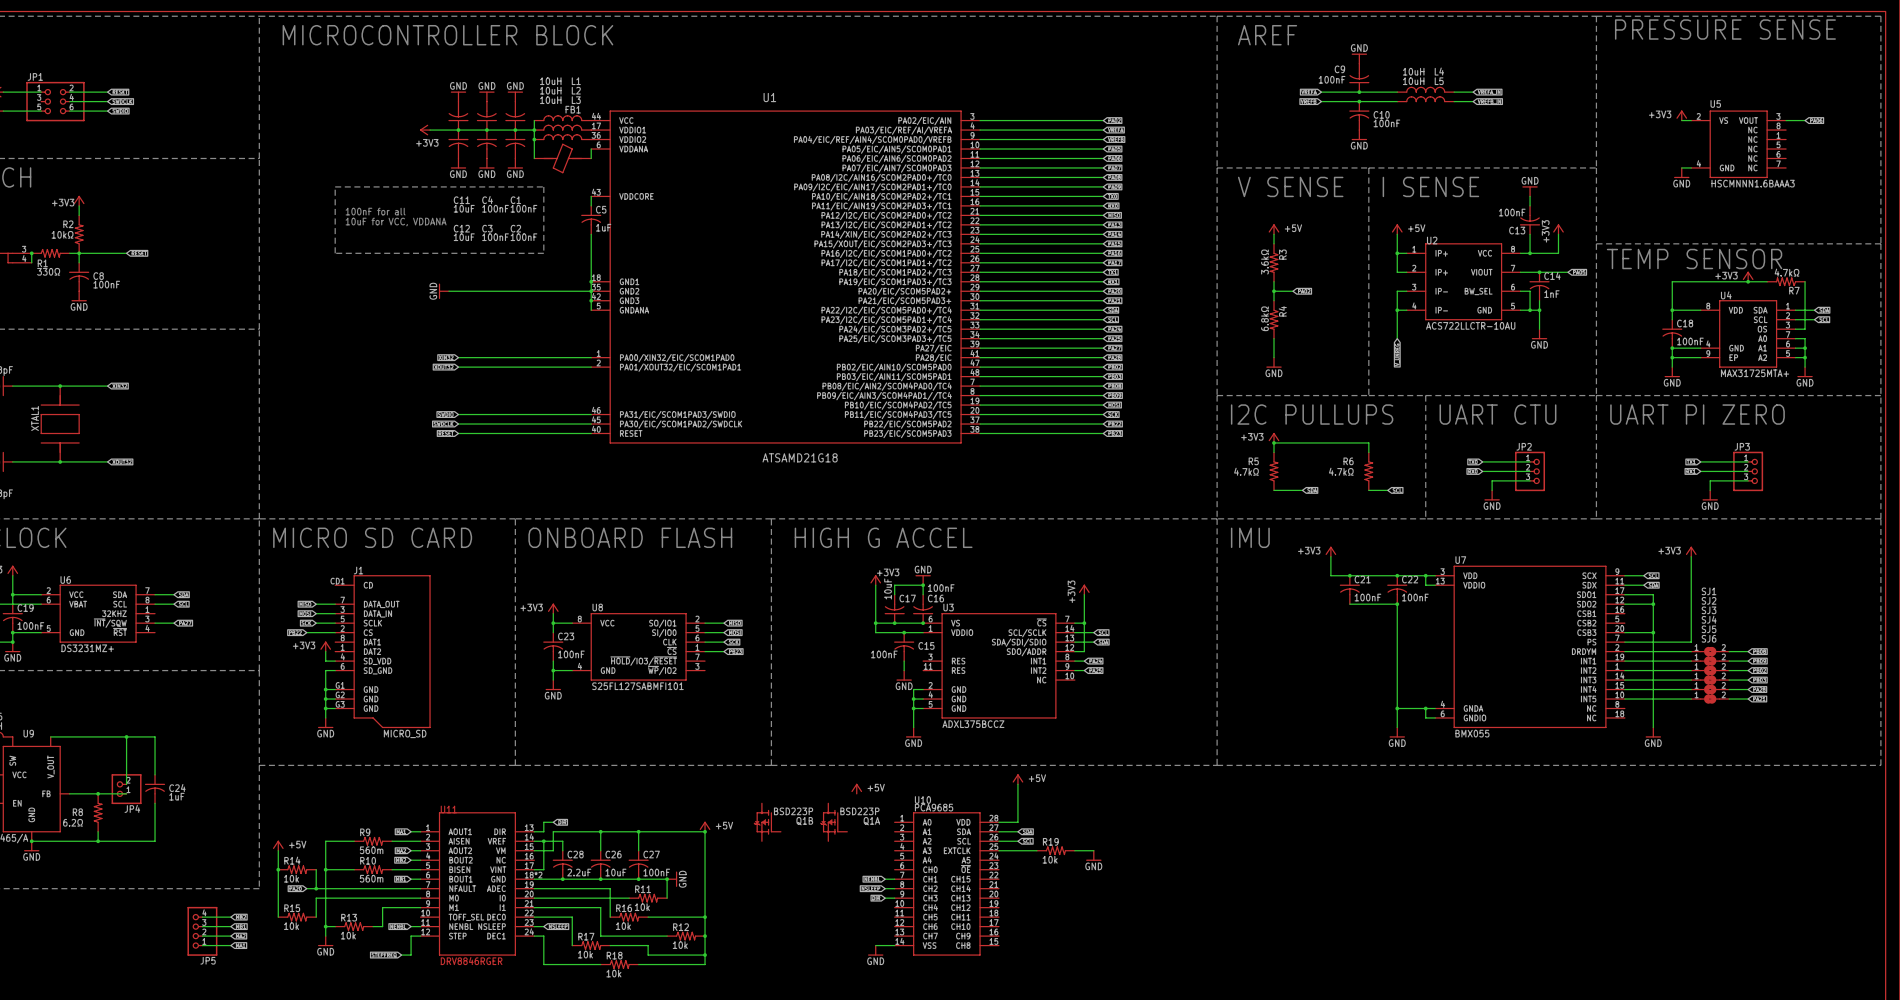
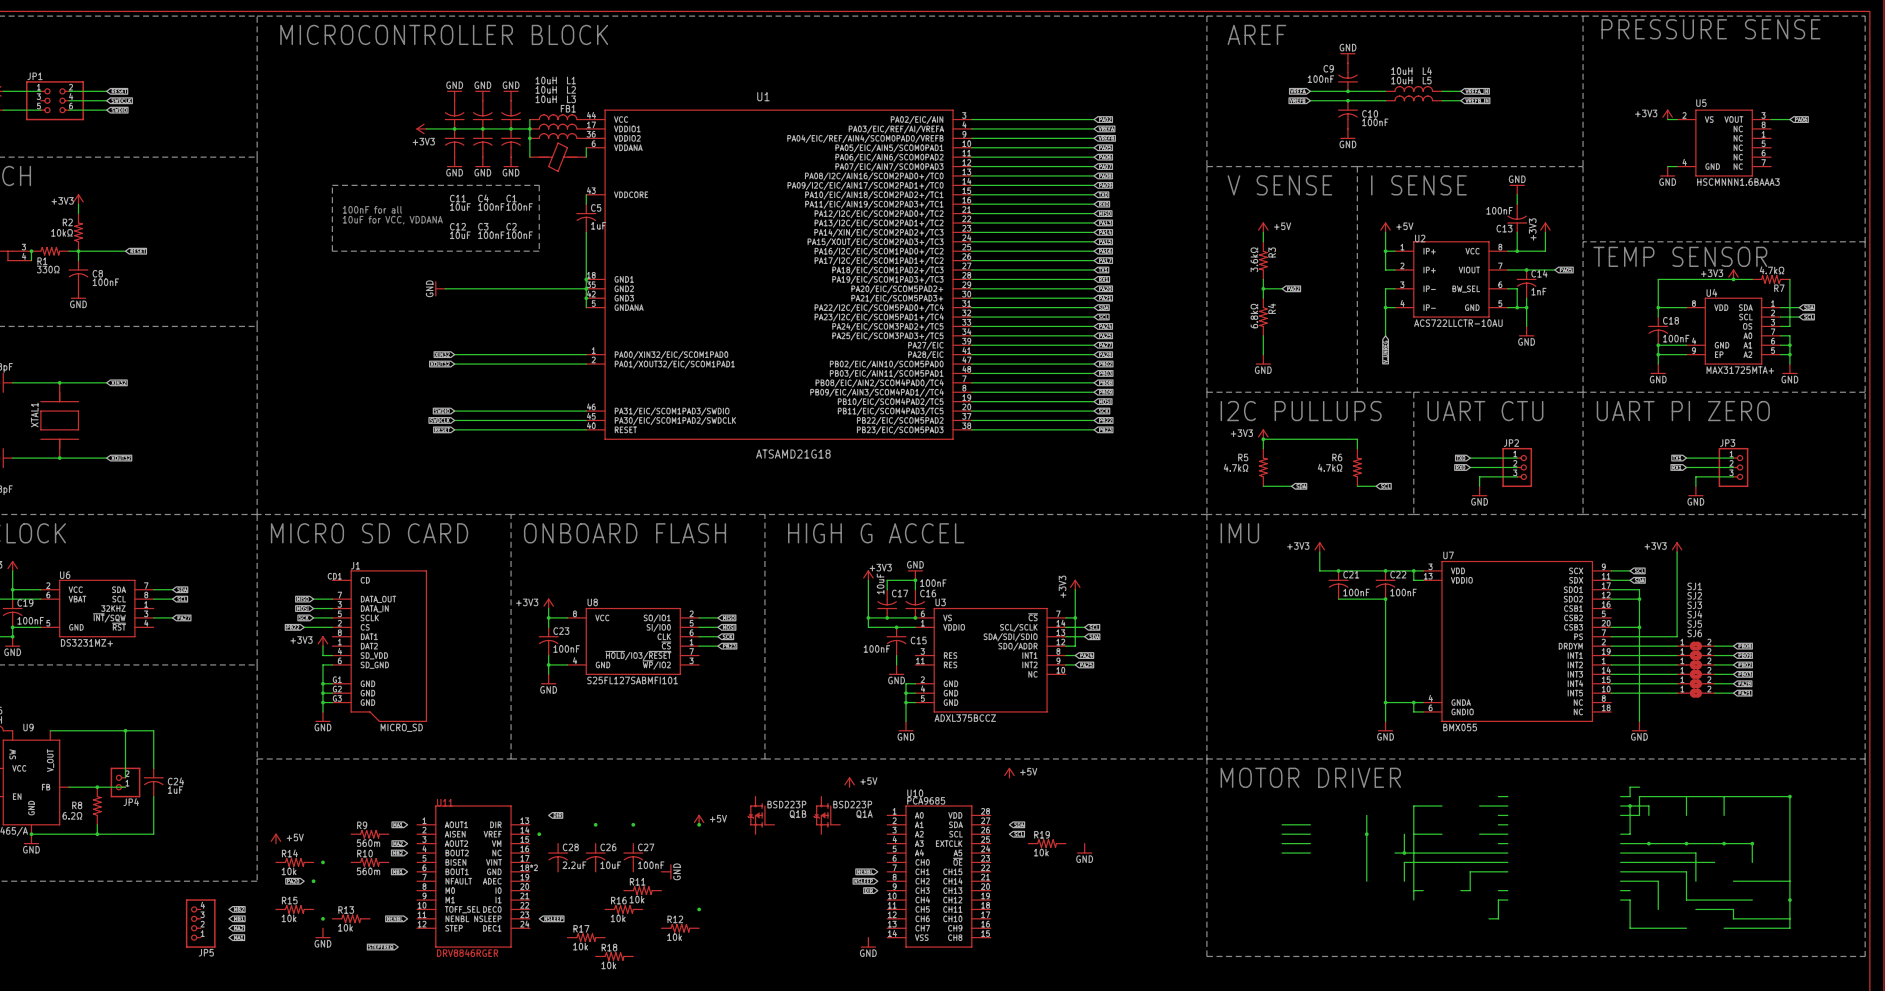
line: none -> (1206, 758) (1206, 956) (1865, 956) (1865, 758)
wire: (1017, 784) (1017, 822) (998, 822) -> none
text: none -> MOTOR DRIVER (1310, 777)
wire: none -> (1639, 787) (1630, 787) (1630, 796) (1620, 796)
wire: none -> (1498, 796) (1507, 796)
wire: none -> (1686, 796) (1686, 815)
wire: none -> (1724, 796) (1724, 815)
junction: none -> (1789, 796)
wire: none -> (1441, 806) (1413, 806) (1413, 900)
wire: none -> (1479, 806) (1507, 806)
wire: none -> (1620, 806) (1648, 806) (1648, 815)
wire: none -> (1630, 806) (1630, 834) (1620, 834)
junction: none -> (1630, 806)
wire: (553, 822) (543, 822) (543, 831) (534, 831) -> none
wire: none -> (1366, 815) (1366, 881)
wire: none -> (1498, 815) (1507, 815)
wire: none -> (1620, 815) (1639, 815) (1639, 796) (1789, 796) (1789, 928) (1724, 928)
wire: (411, 831) (420, 831) -> none
wire: (600, 831) (600, 850) -> none
wire: (638, 831) (638, 850) -> none
wire: (998, 831) (1017, 831) -> none
wire: none -> (1282, 824) (1310, 824)
wire: none -> (1498, 824) (1507, 824)
wire: (354, 841) (325, 841) (325, 936) -> none
wire: (392, 841) (420, 841) -> none
wire: (534, 841) (562, 841) (562, 850) -> none
wire: (543, 841) (543, 869) (534, 869) -> none
wire: (998, 841) (1017, 841) -> none
wire: none -> (1282, 834) (1310, 834)
junction: none -> (1366, 834)
wire: none -> (1404, 834) (1404, 853)
wire: none -> (1413, 834) (1441, 834)
wire: none -> (1479, 834) (1507, 834)
wire: (278, 850) (278, 917) -> none
wire: (411, 850) (420, 850) -> none
wire: (534, 850) (553, 850) (553, 831) (705, 831) (705, 964) (638, 964) -> none
wire: (998, 850) (1036, 850) -> none
wire: (1074, 850) (1093, 850) -> none
wire: none -> (1282, 843) (1310, 843)
wire: none -> (1498, 843) (1507, 843)
wire: none -> (1620, 843) (1752, 843) (1752, 862)
junction: none -> (1648, 843)
junction: none -> (1686, 843)
junction: none -> (1724, 843)
junction: none -> (1752, 843)
wire: (411, 860) (420, 860) -> none
wire: none -> (1282, 853) (1310, 853)
wire: none -> (1394, 853) (1507, 853)
junction: none -> (1404, 853)
wire: none -> (1620, 853) (1695, 853) (1695, 881)
junction: (278, 869) -> none
wire: (316, 869) (316, 888) -> none
wire: (325, 869) (354, 869) -> none
wire: (392, 869) (420, 869) -> none
wire: none -> (1507, 862) (1404, 862) (1404, 881)
wire: none -> (1620, 862) (1714, 862)
wire: (411, 879) (420, 879) -> none
wire: (534, 879) (667, 879) (667, 898) -> none
junction: (562, 879) -> none
junction: (600, 879) -> none
junction: (638, 879) -> none
junction: (667, 879) -> none
wire: (885, 879) (894, 879) -> none
wire: none -> (1507, 871) (1470, 871) (1470, 890) (1460, 890)
wire: none -> (1620, 871) (1686, 871) (1686, 900) (1752, 900)
wire: (306, 888) (420, 888) -> none
wire: (534, 888) (610, 888) (610, 917) -> none
wire: (885, 888) (894, 888) -> none
wire: none -> (1620, 881) (1658, 881) (1658, 909)
wire: none -> (1733, 881) (1789, 881)
wire: (420, 898) (316, 898) (316, 917) -> none
wire: (534, 898) (629, 898) -> none
wire: (885, 898) (894, 898) -> none
wire: none -> (1413, 890) (1423, 890)
wire: none -> (1498, 890) (1507, 890)
wire: none -> (1620, 890) (1630, 890)
wire: (420, 907) (382, 907) (382, 926) (373, 926) -> none
wire: (534, 907) (600, 907) (600, 936) (667, 936) -> none
wire: none -> (1507, 900) (1498, 900) (1498, 918) (1489, 918)
wire: none -> (1620, 900) (1630, 900) (1630, 928) (1686, 928)
junction: none -> (1789, 900)
wire: (202, 917) (230, 917) -> none
wire: (534, 917) (572, 917) (572, 945) -> none
wire: (648, 917) (705, 917) -> none
wire: none -> (1695, 909) (1733, 909) (1733, 918) (1789, 918)
wire: (202, 926) (230, 926) -> none
wire: (325, 926) (335, 926) -> none
wire: (411, 926) (420, 926) -> none
wire: (534, 926) (543, 926) -> none
wire: (202, 936) (230, 936) -> none
wire: (420, 936) (411, 936) (411, 955) (401, 955) -> none
wire: (534, 936) (543, 936) (543, 964) (600, 964) -> none
junction: (705, 936) -> none
wire: (202, 945) (230, 945) -> none
wire: (610, 945) (648, 945) (648, 955) (705, 955) -> none
wire: (875, 945) (894, 945) -> none
junction: (705, 955) -> none

